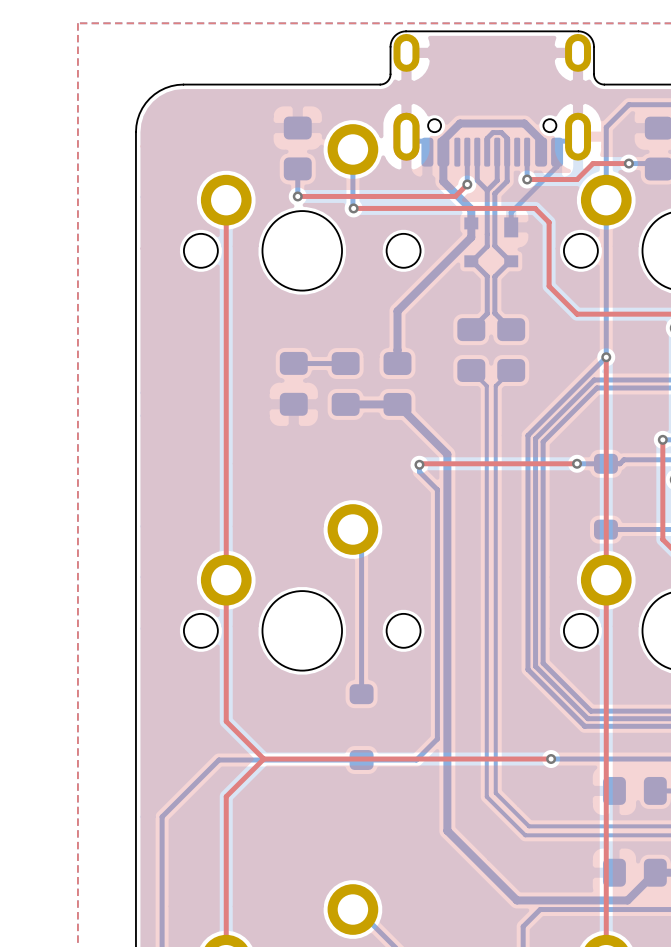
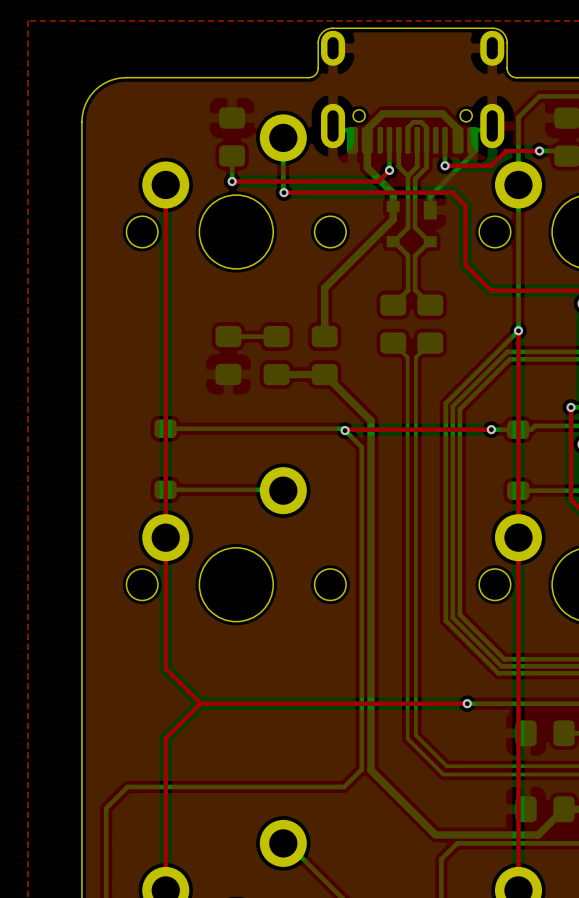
bottom track: (419, 464) (419, 471) (437, 489) -> (165, 428) (343, 428) (361, 447) (361, 453)
bottom track: none -> (165, 489) (283, 490)
bottom track: (361, 538) (361, 694) -> none
part position: (361, 727) -> (165, 459)
bottom track: (437, 739) (416, 760) (218, 760) (162, 816) (162, 871) -> (361, 685) (361, 769) (344, 787) (127, 787) (106, 808)

